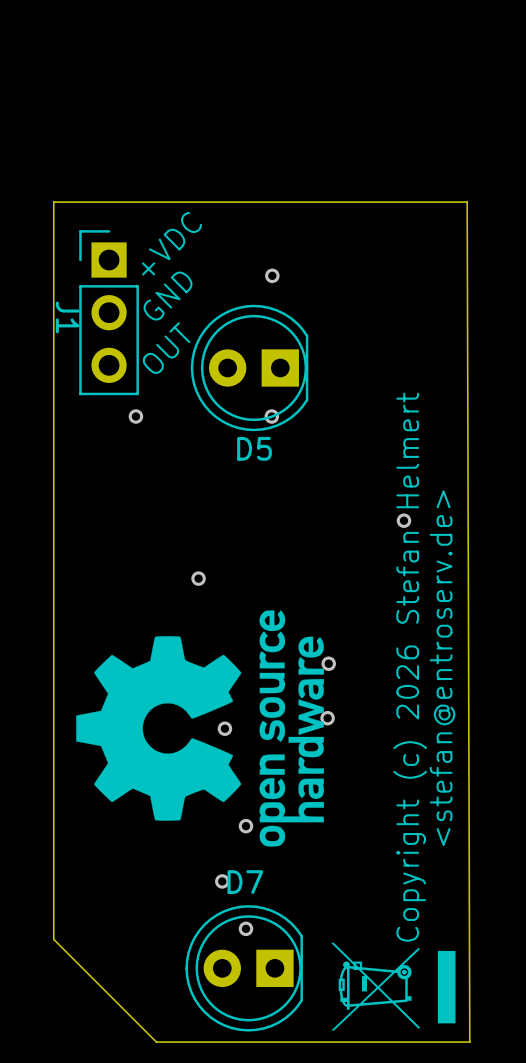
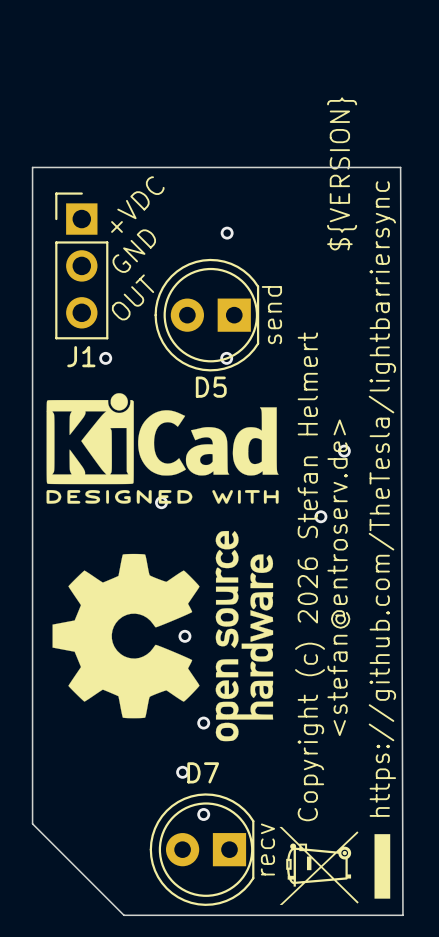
text: none -> ${VERSION} (342, 173)
J1 name rotation: 0° (67, 317) -> 90° counterclockwise (81, 356)
J1 name position: J1 (67, 317) -> J1 (81, 356)
text: none -> send (271, 315)
drawing: none -> [46, 393, 279, 504]
text: none -> https://github.com/TheTesla/lightbarriersync (382, 499)
via: none -> (320, 516)
via: (328, 663) -> none
text position: Copyright (c) 2026 Stefan Helmert (410, 667) -> Copyright (c) 2026 Stefan Helmert (310, 576)
text position: <stefan@entroserv.de> (442, 668) -> <stefan@entroserv.de> (338, 577)
via: (327, 718) -> none
text: none -> recv (267, 849)

